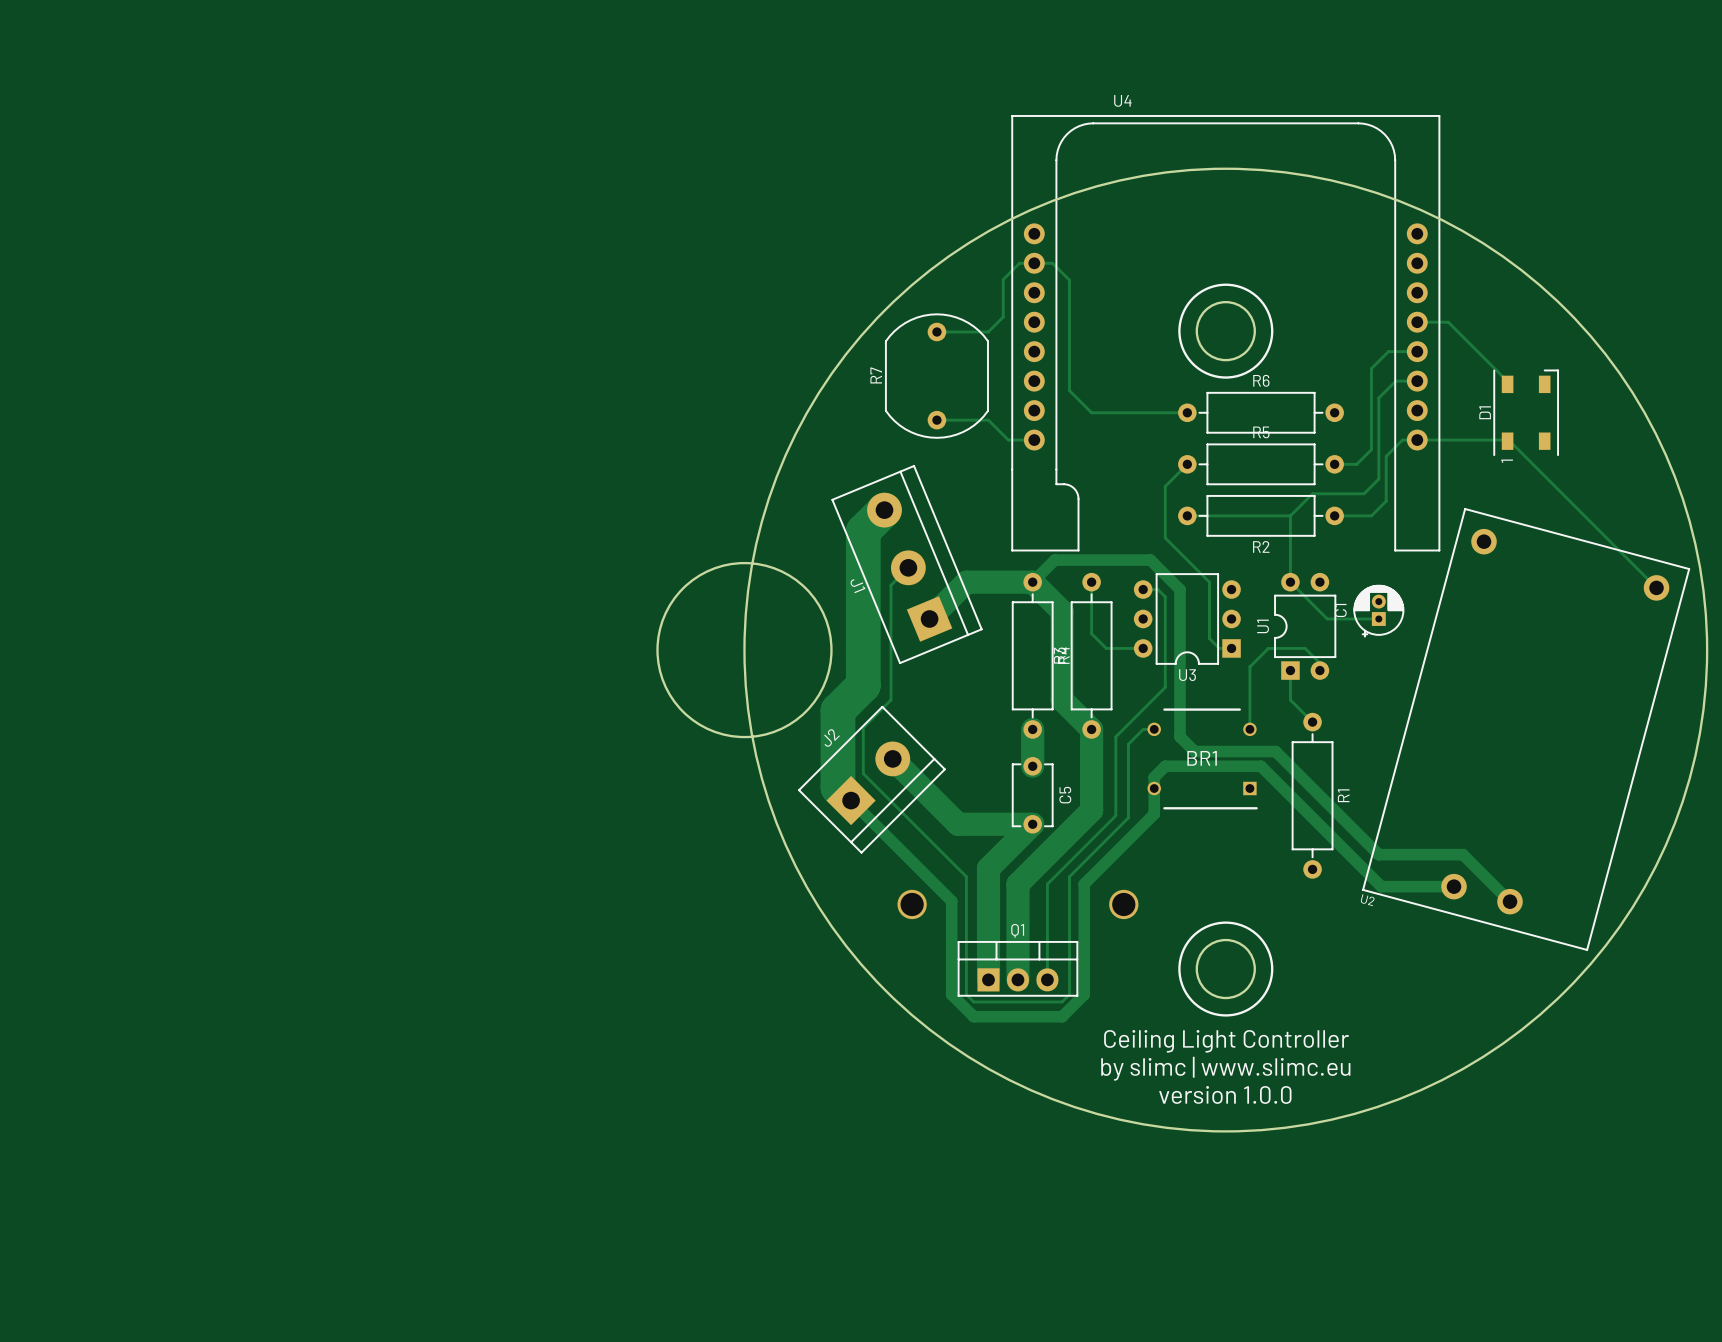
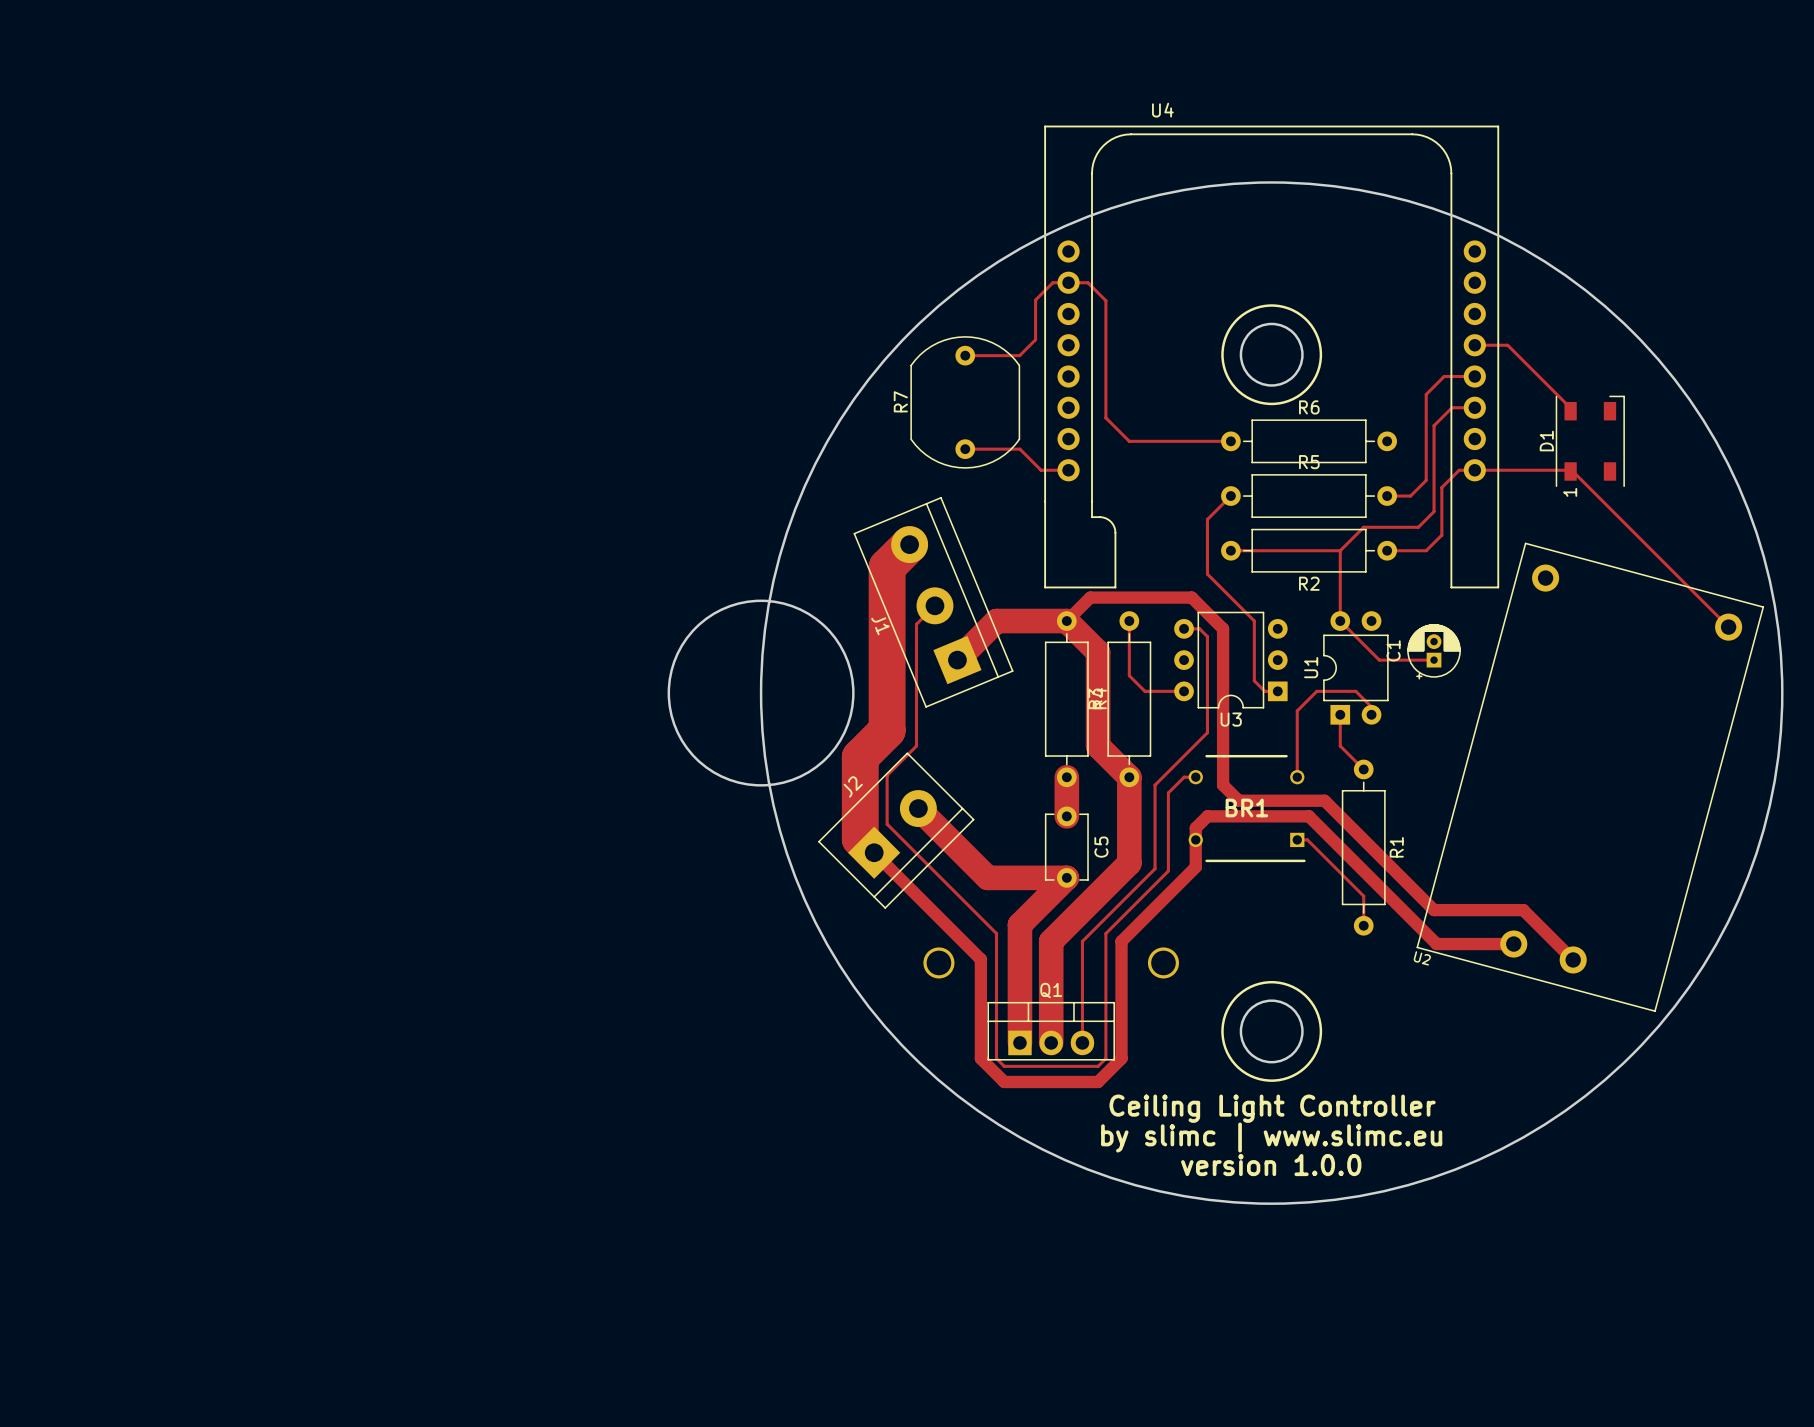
track: none -> (1297, 839) (1307, 839) (1363, 896) (1363, 925)

